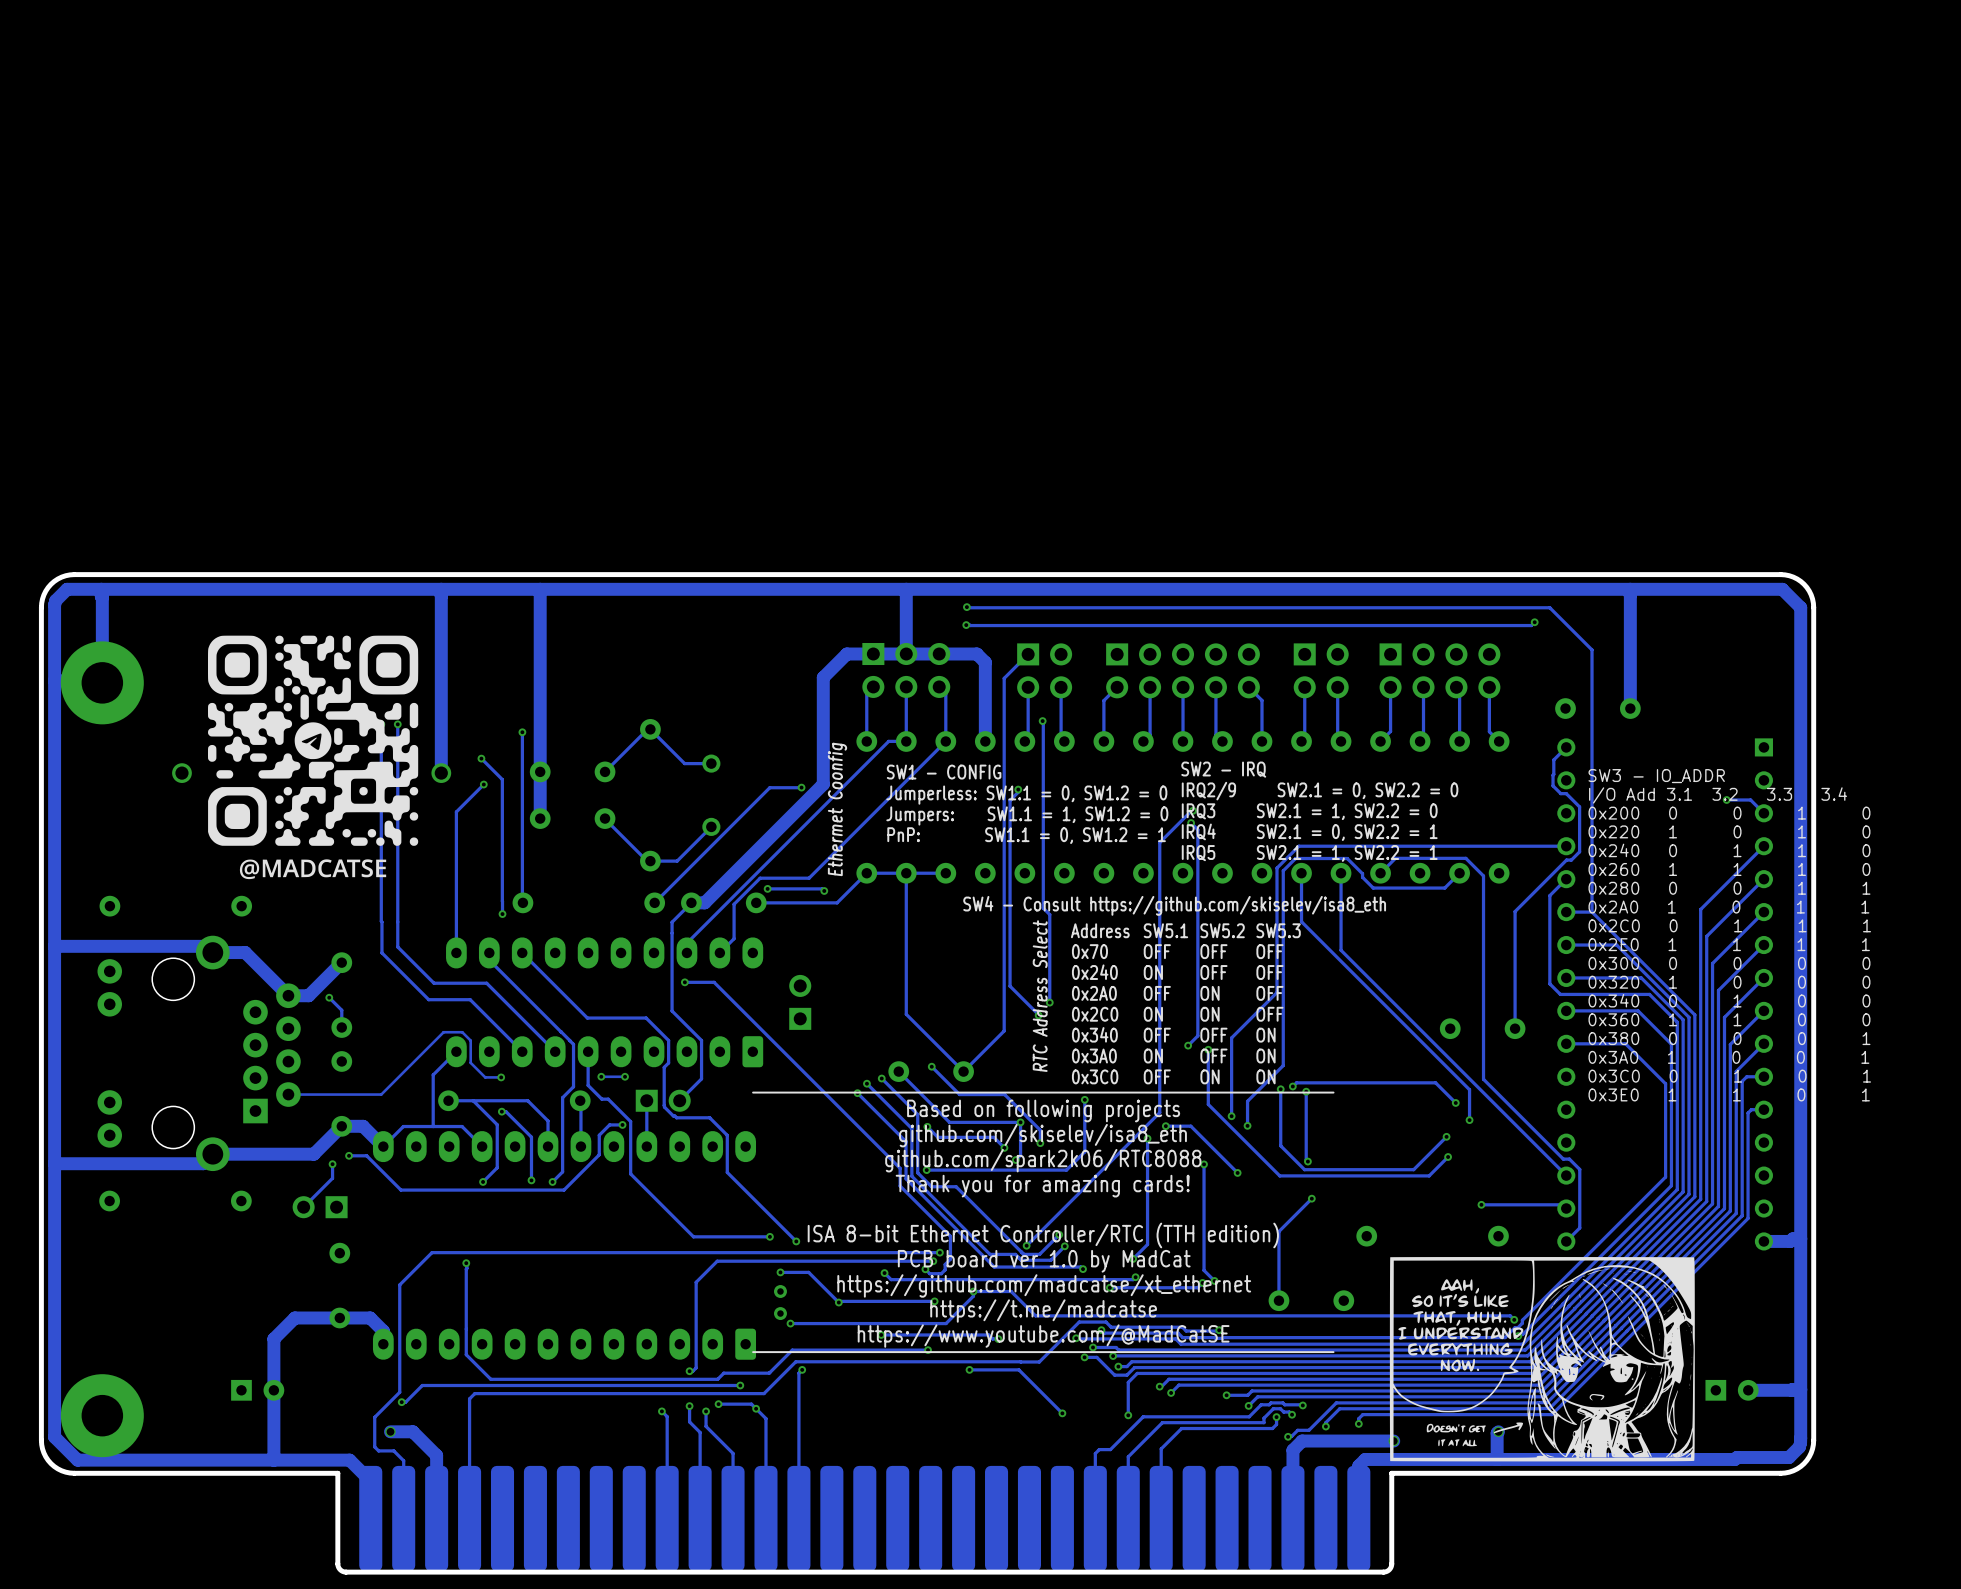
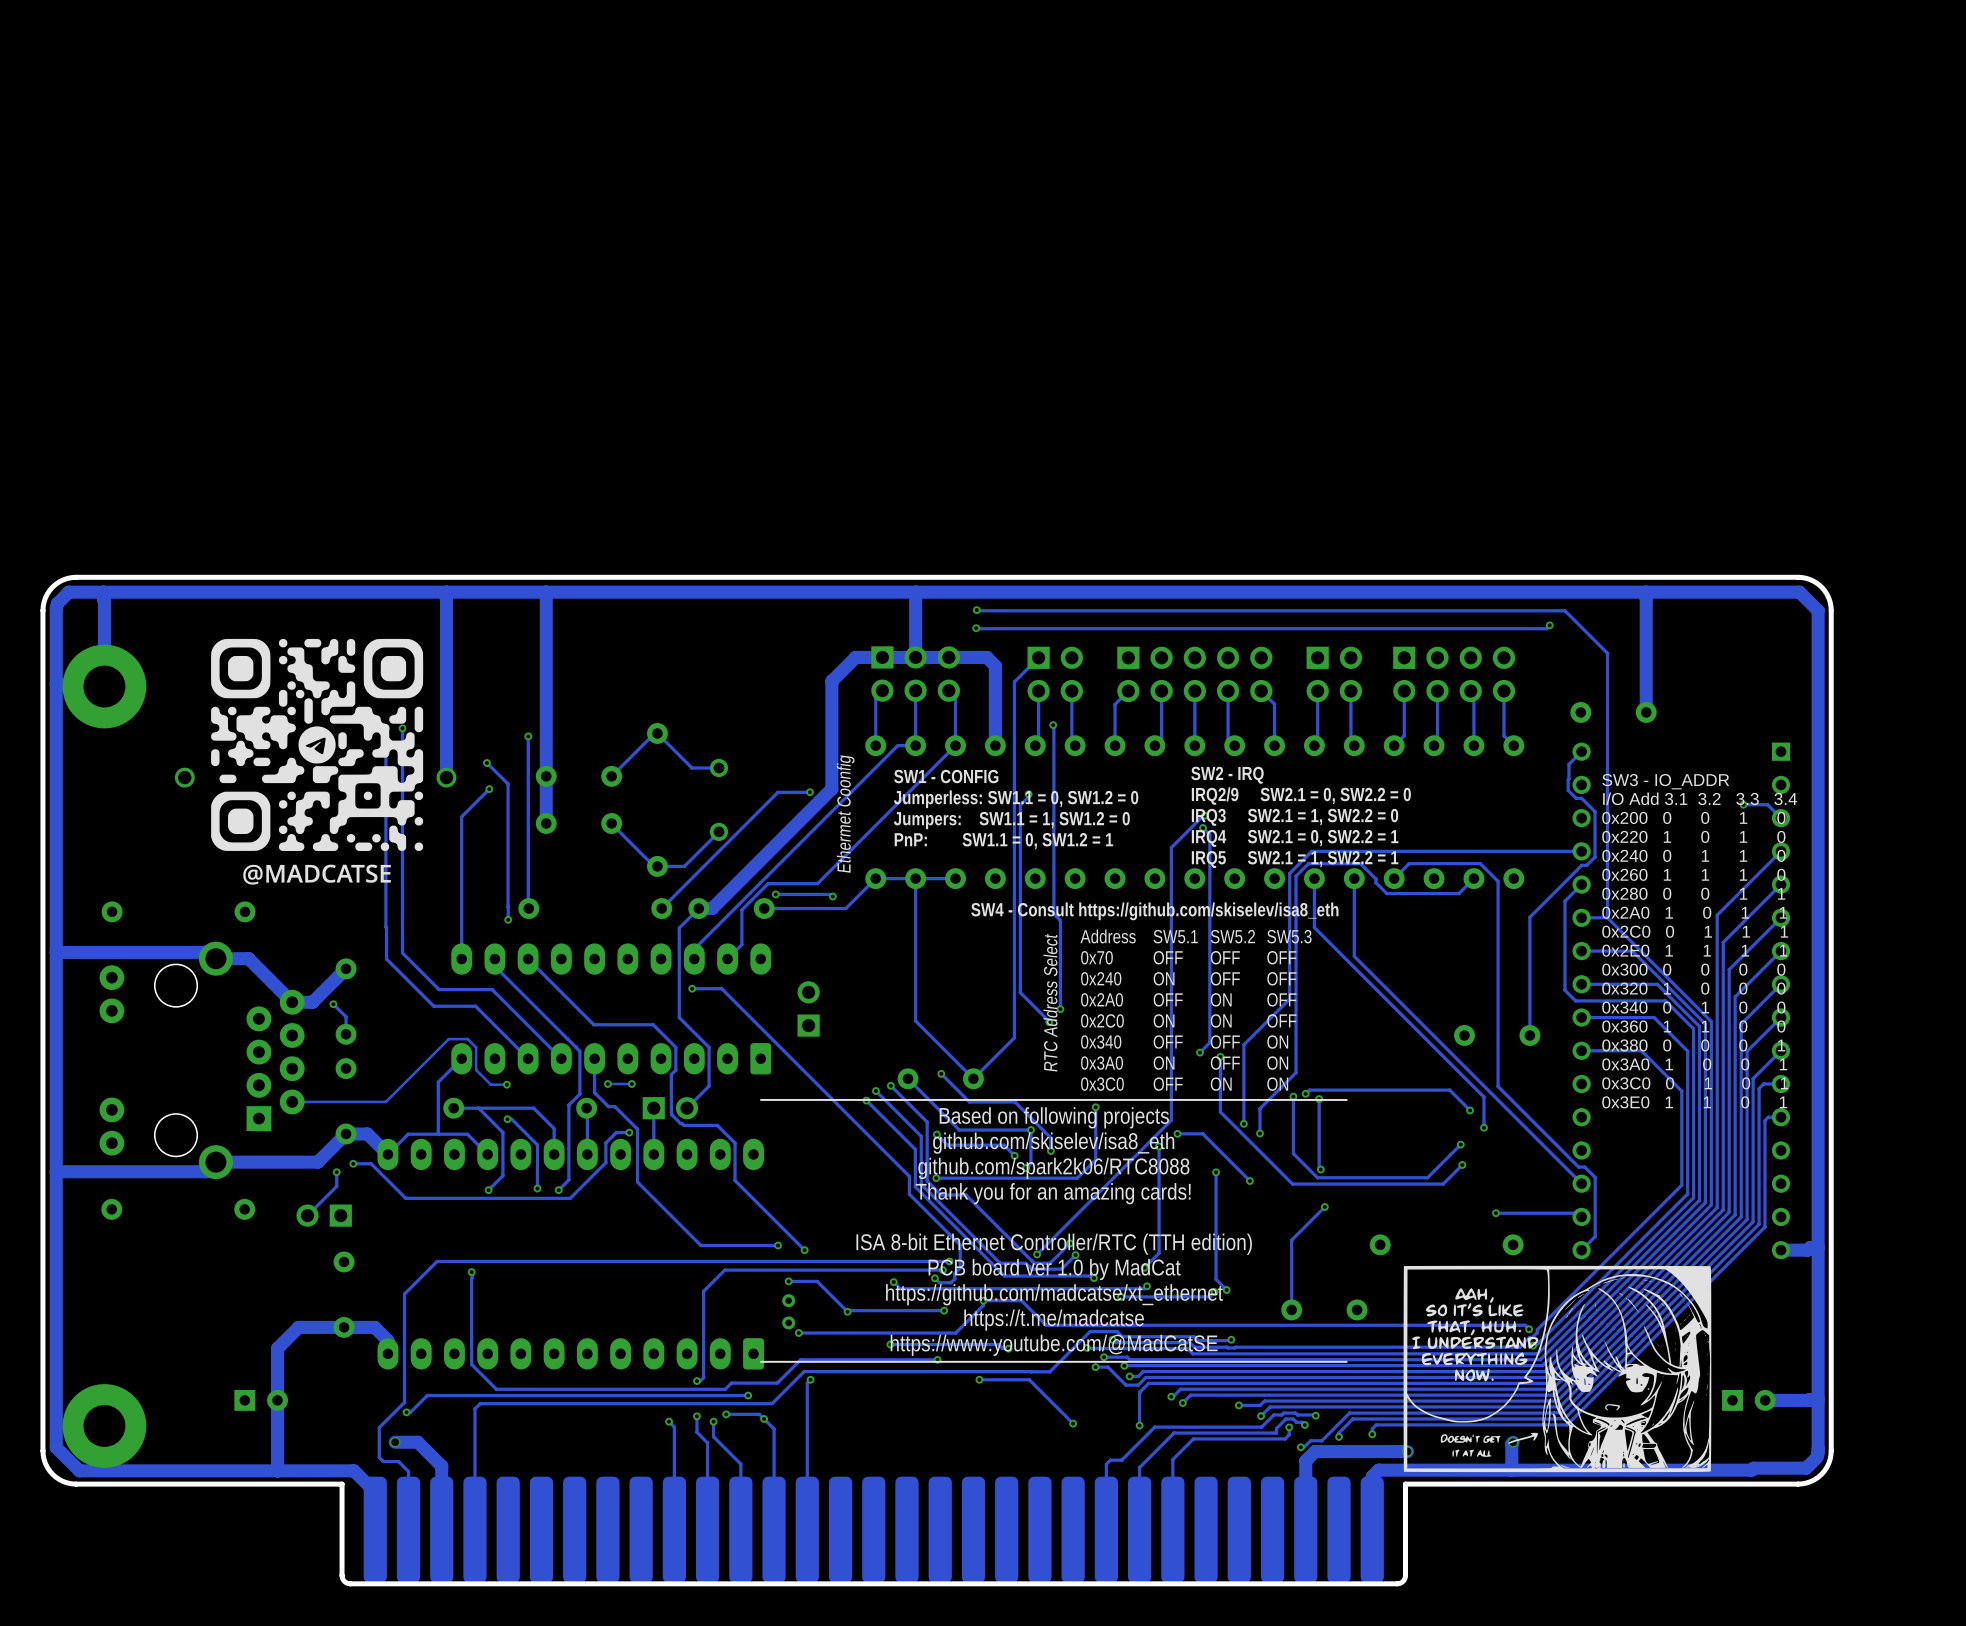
text: Thank you for amazing cards! (1042, 1186) -> Thank you for an amazing cards! (1053, 1193)

